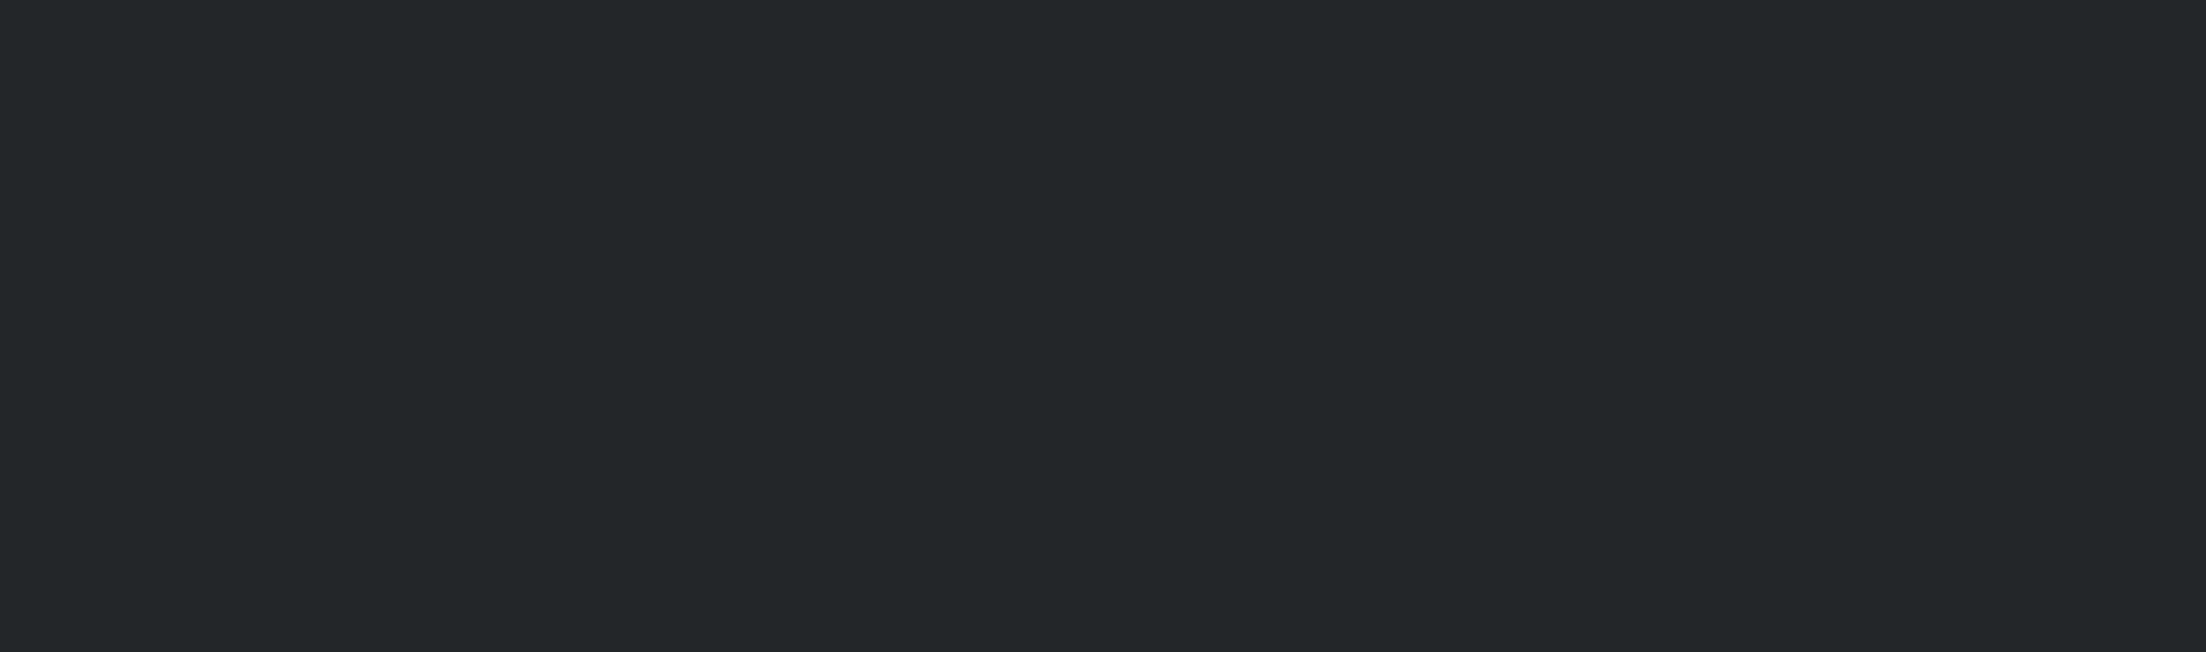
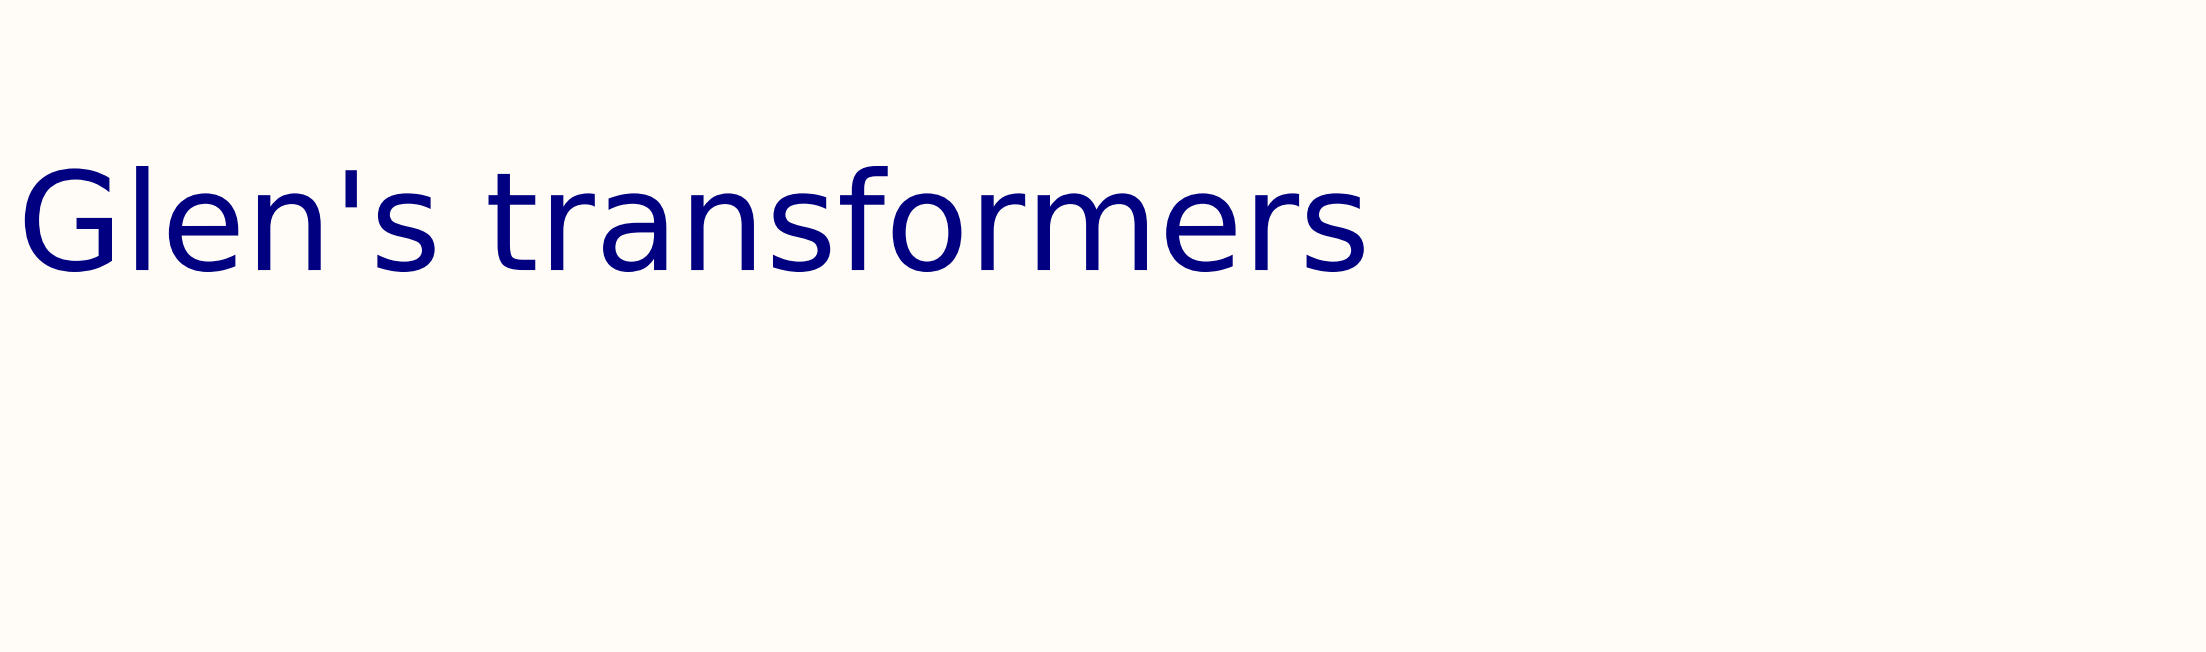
text: none -> Glen's transformers (694, 219)

